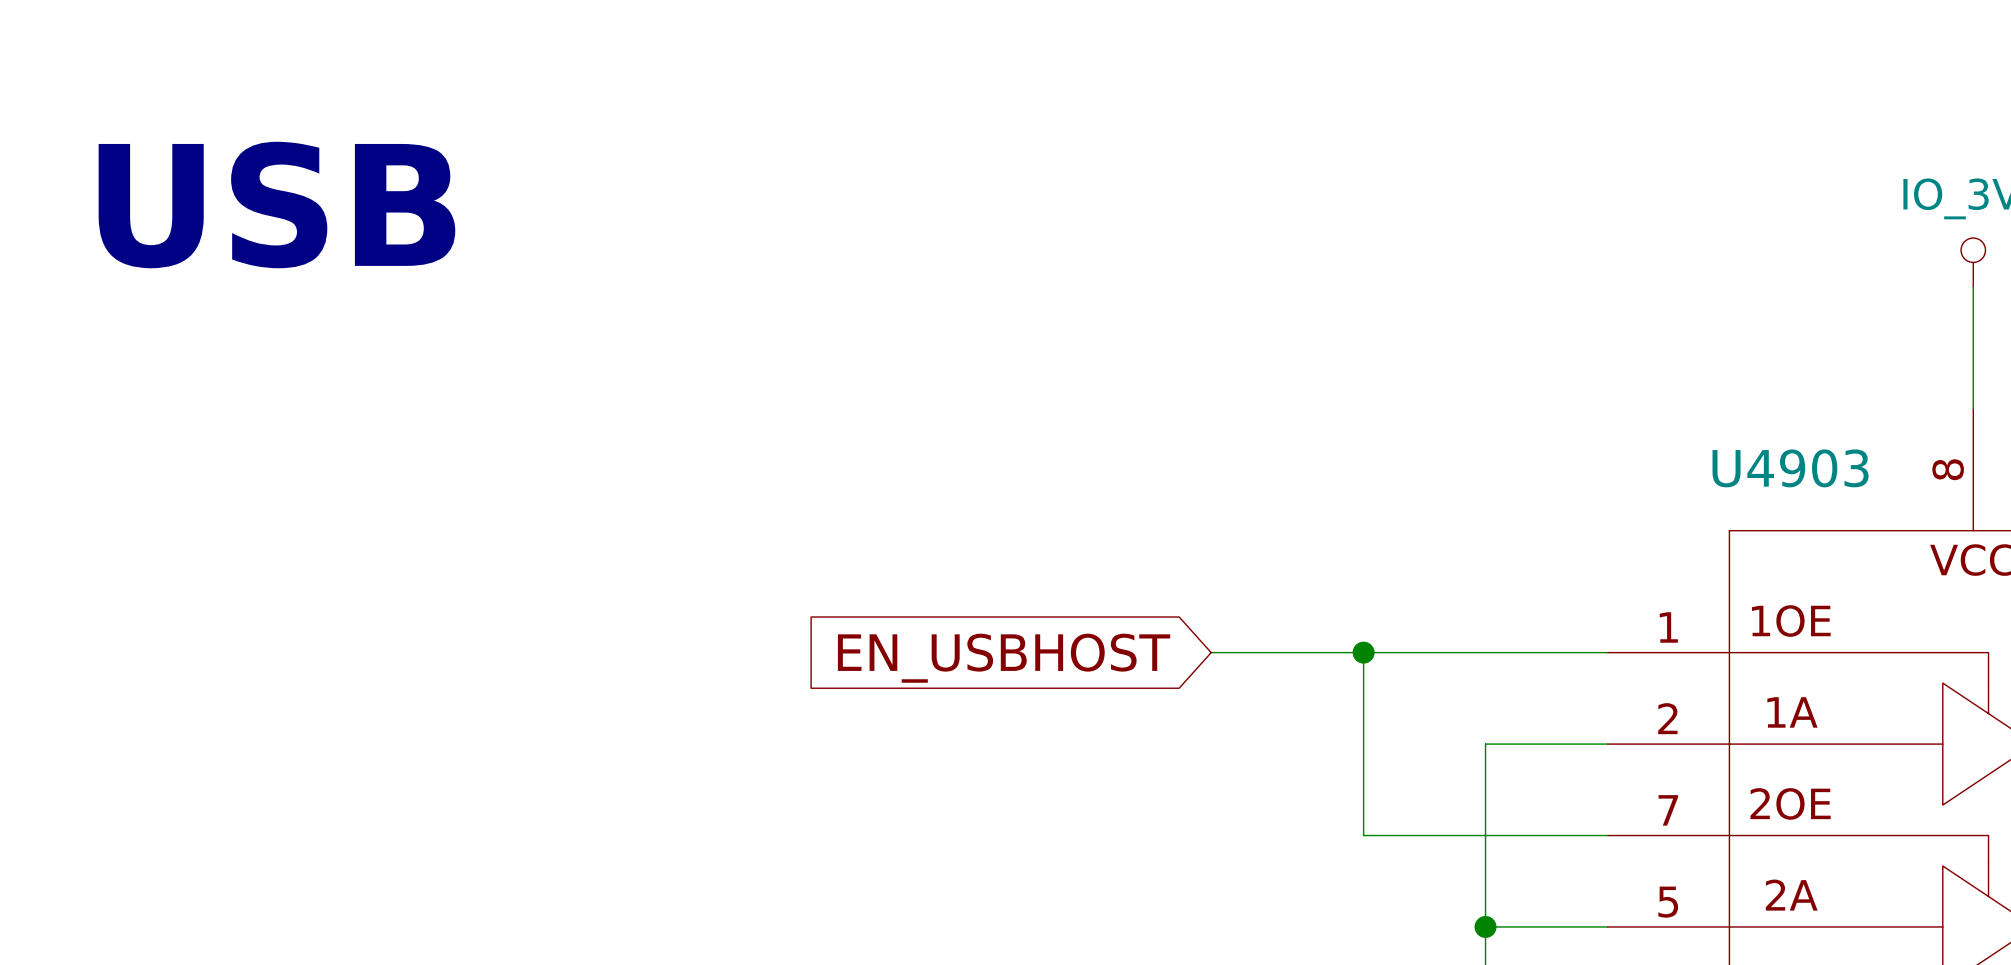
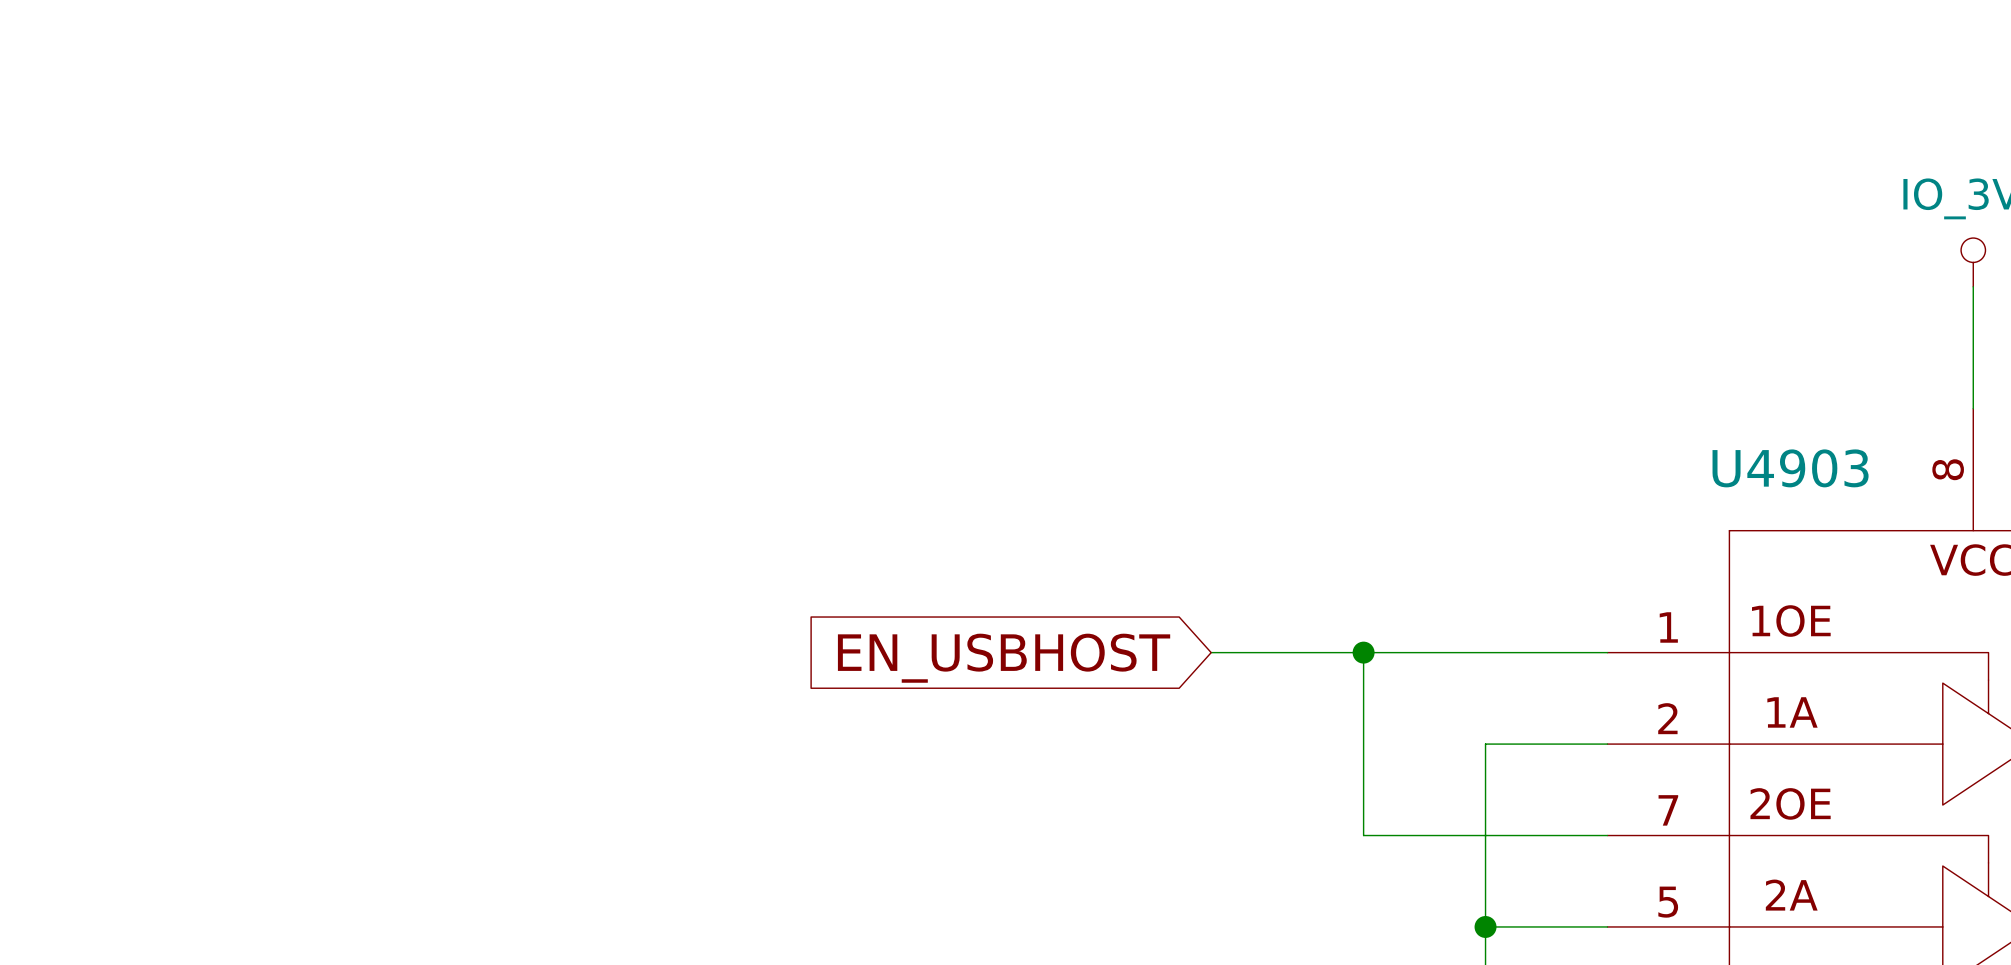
text: USB (276, 205) -> none

